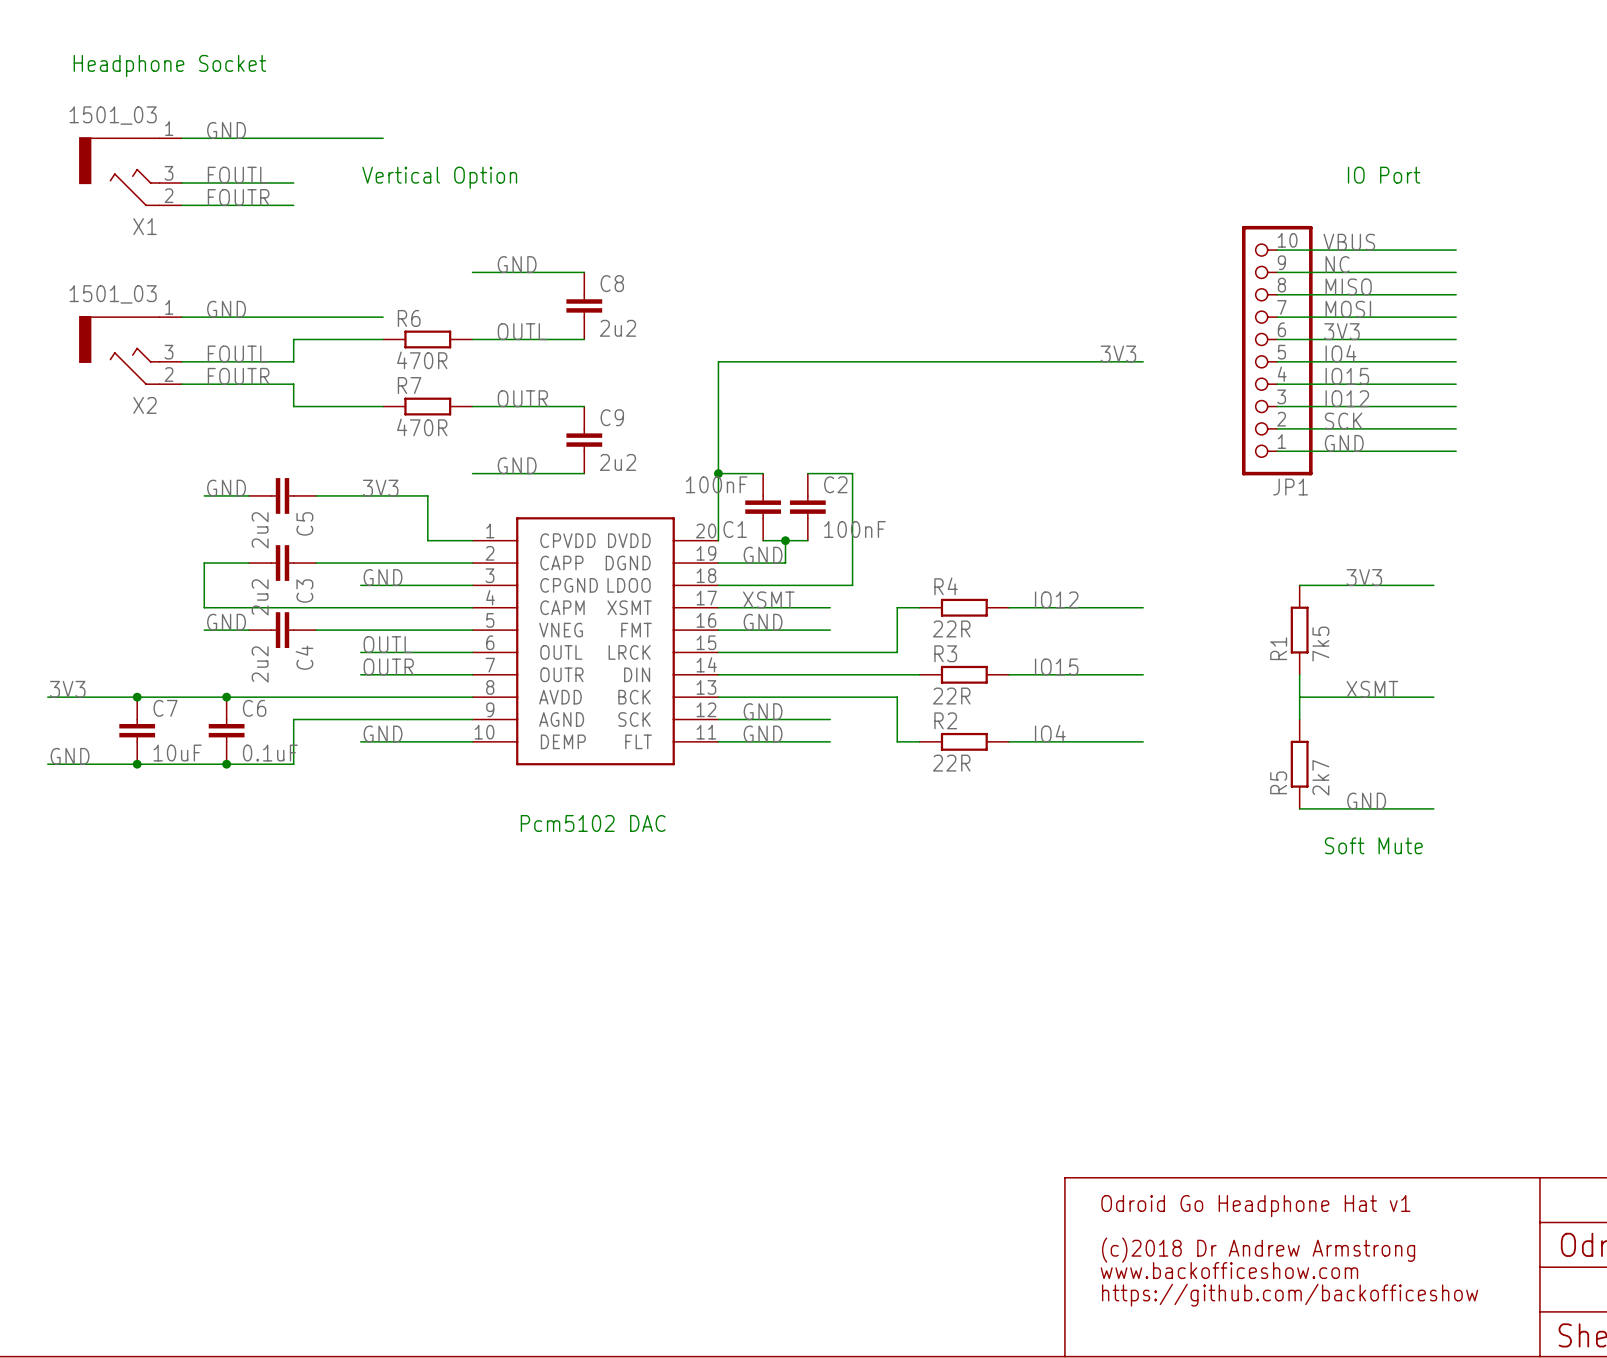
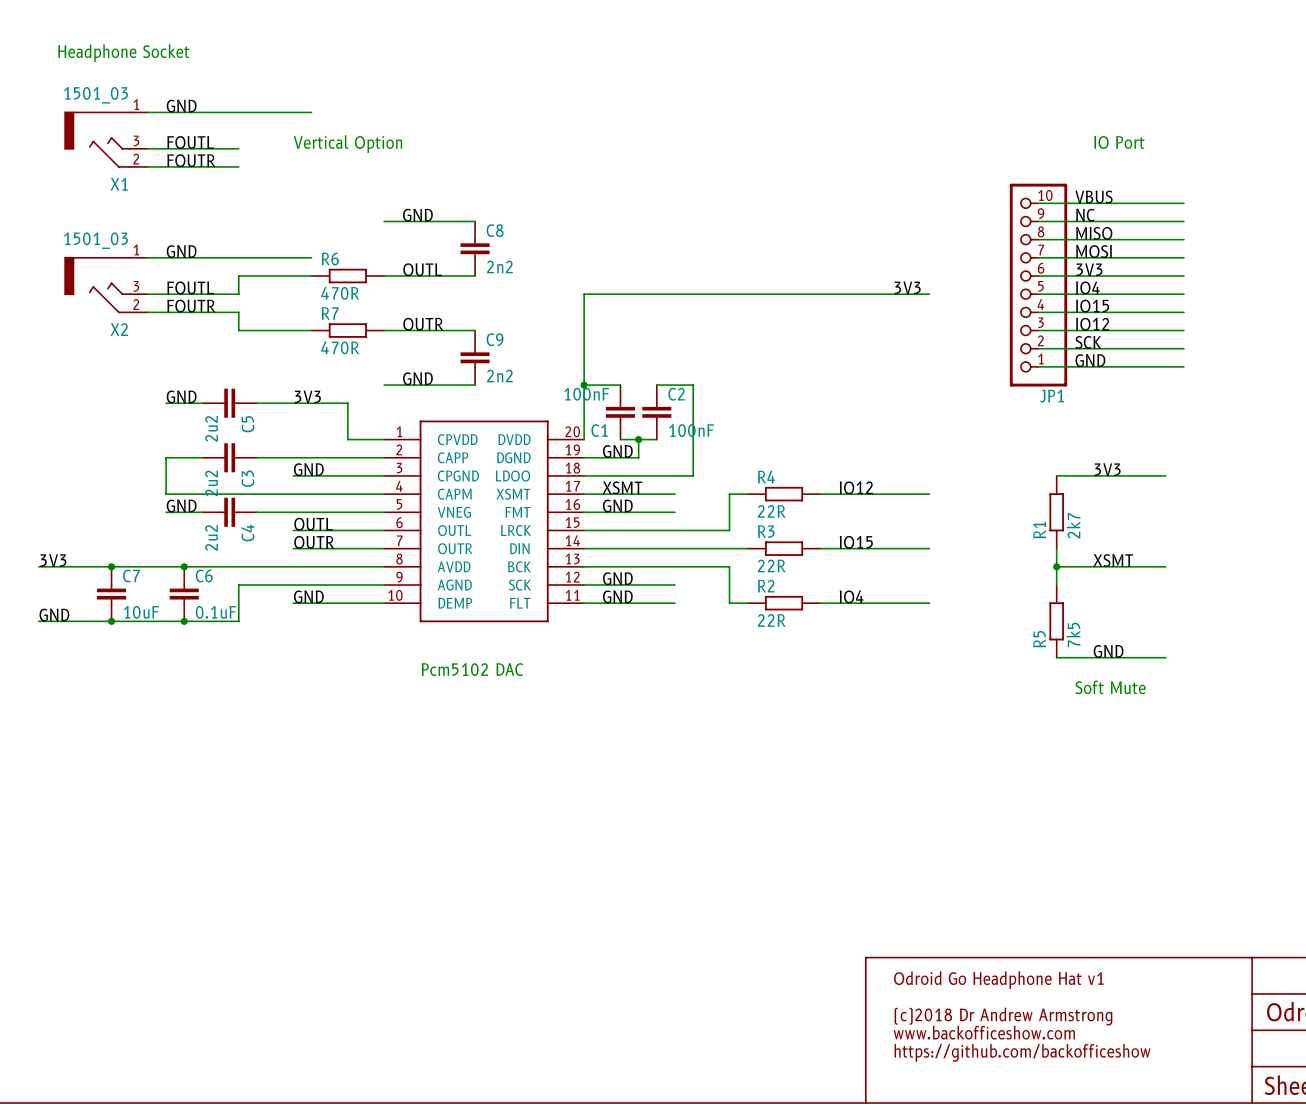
C8 value: 2u2 (617, 328) -> 2n2 (499, 266)
C9 value: 2u2 (617, 462) -> 2n2 (499, 375)
R1 value: 7k5 (1320, 644) -> 2k7 (1073, 525)
junction: none -> (1056, 566)
R5 value: 2k7 (1320, 777) -> 7k5 (1073, 634)

